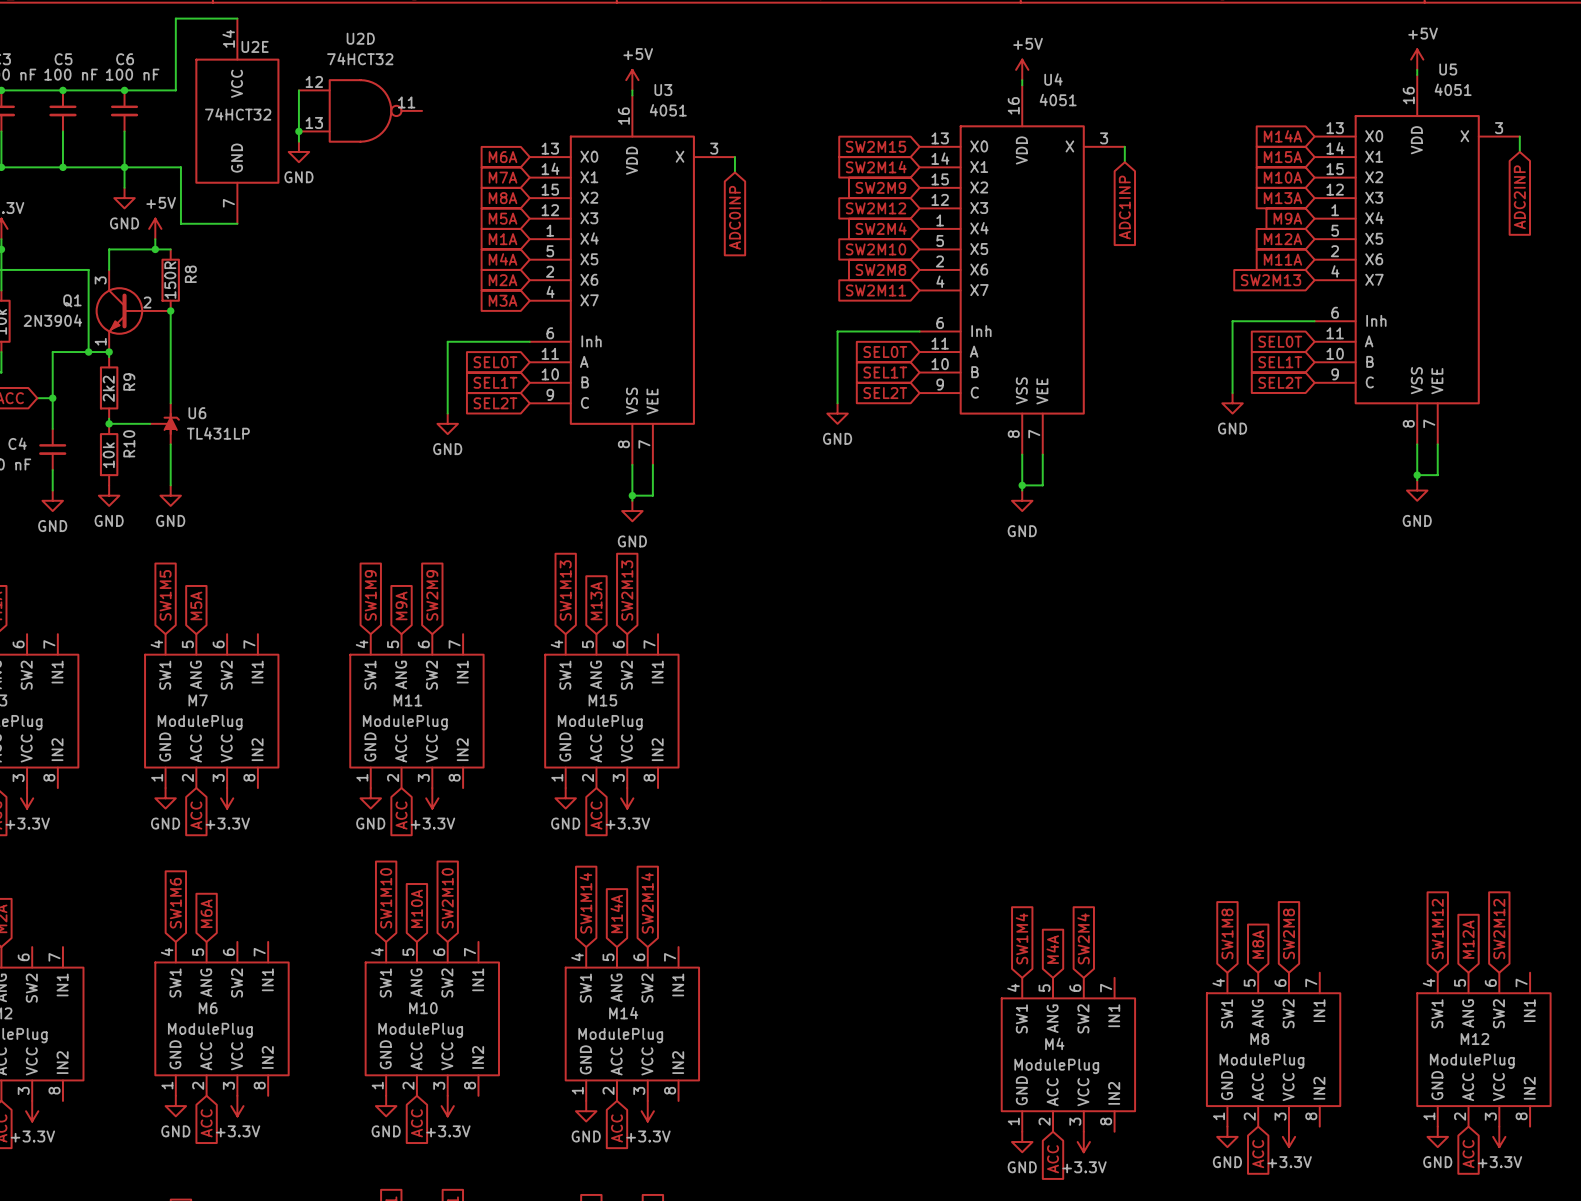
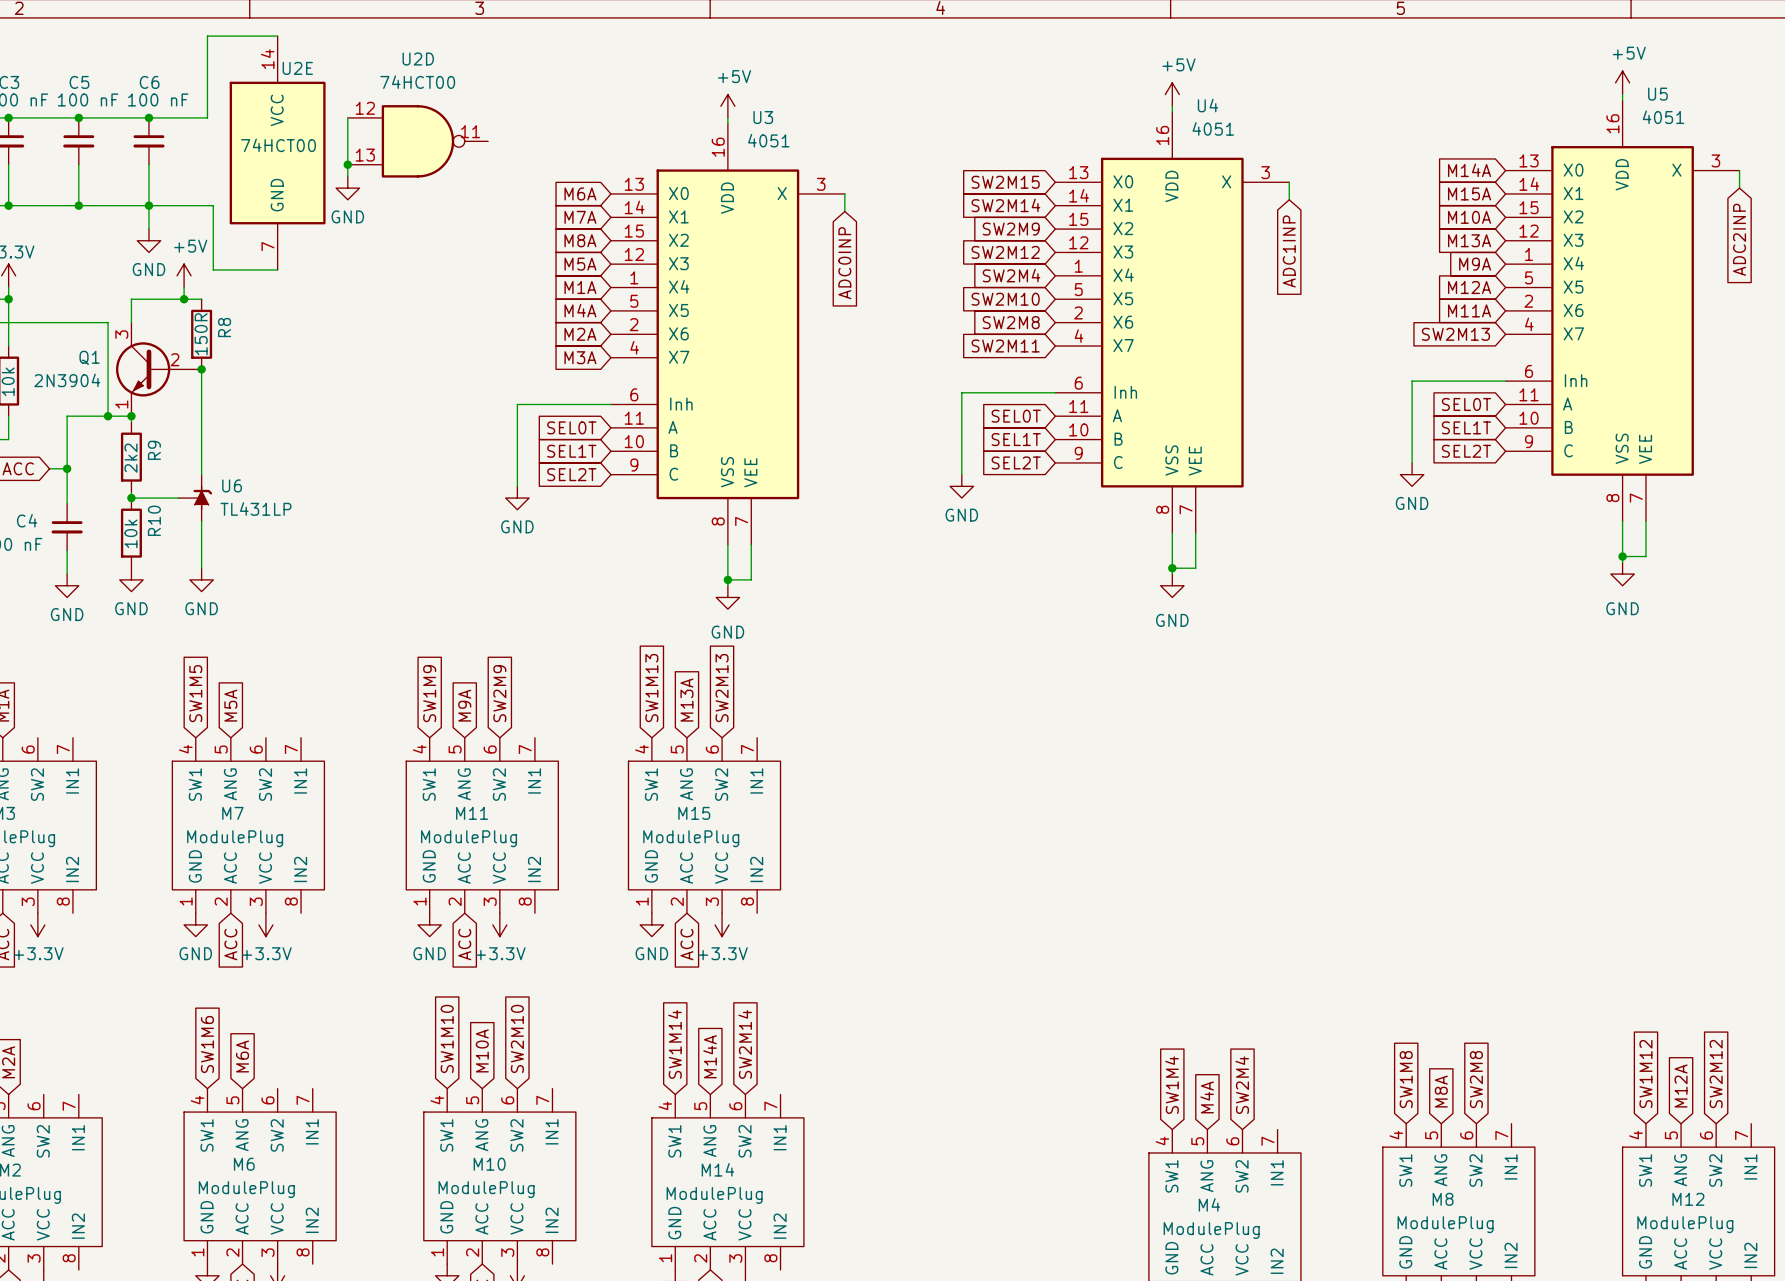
U2D value: 74HCT32 (360, 59) -> 74HCT00 (417, 82)
U2E value: 74HCT32 (238, 114) -> 74HCT00 (278, 145)

